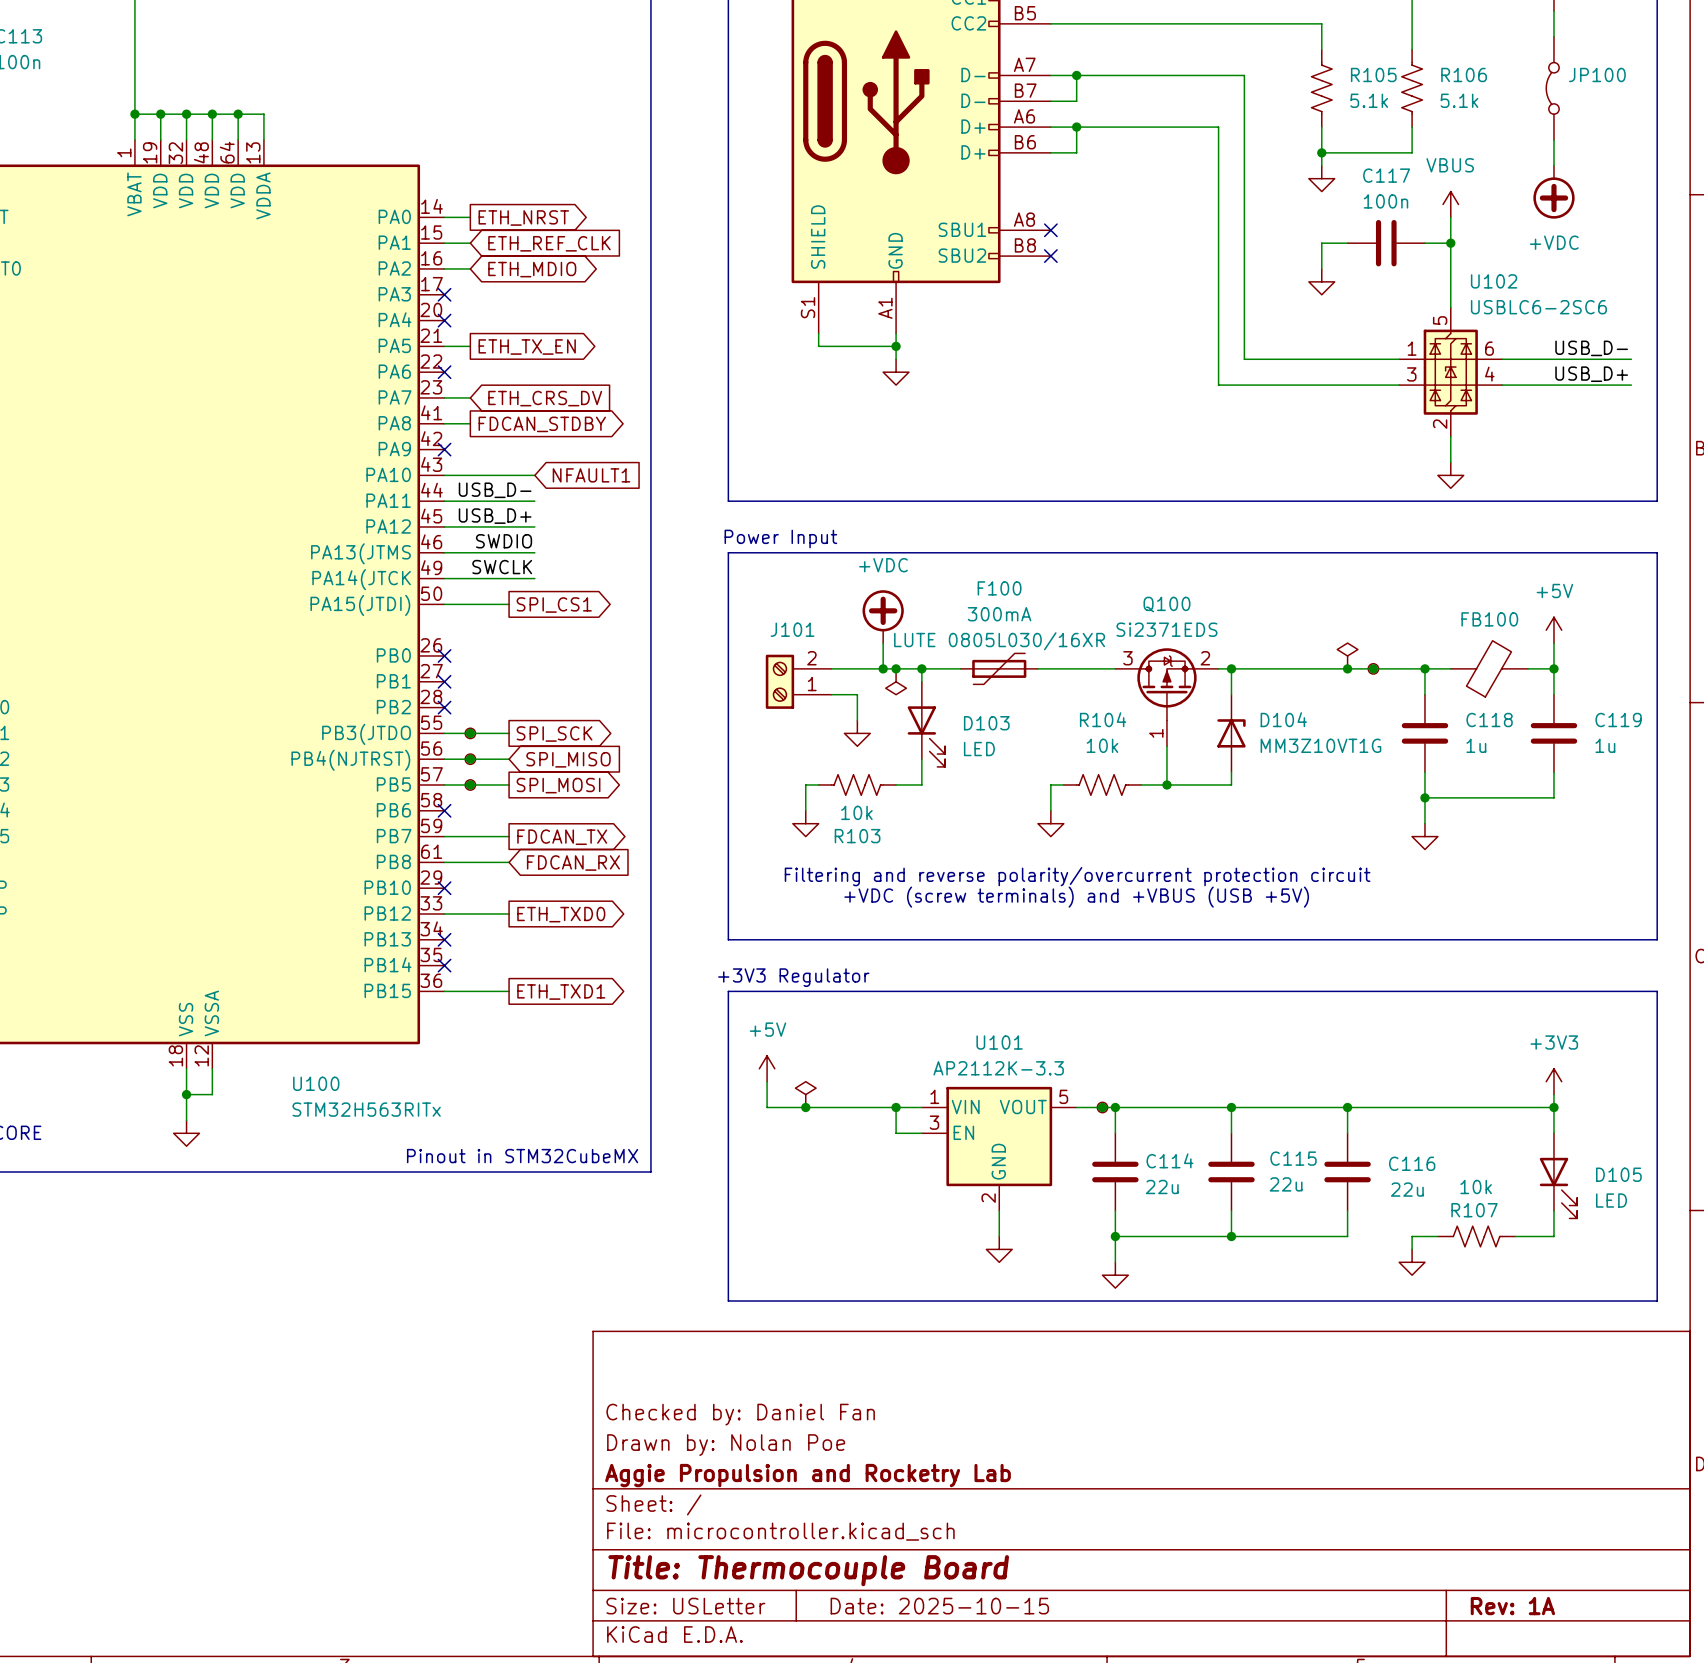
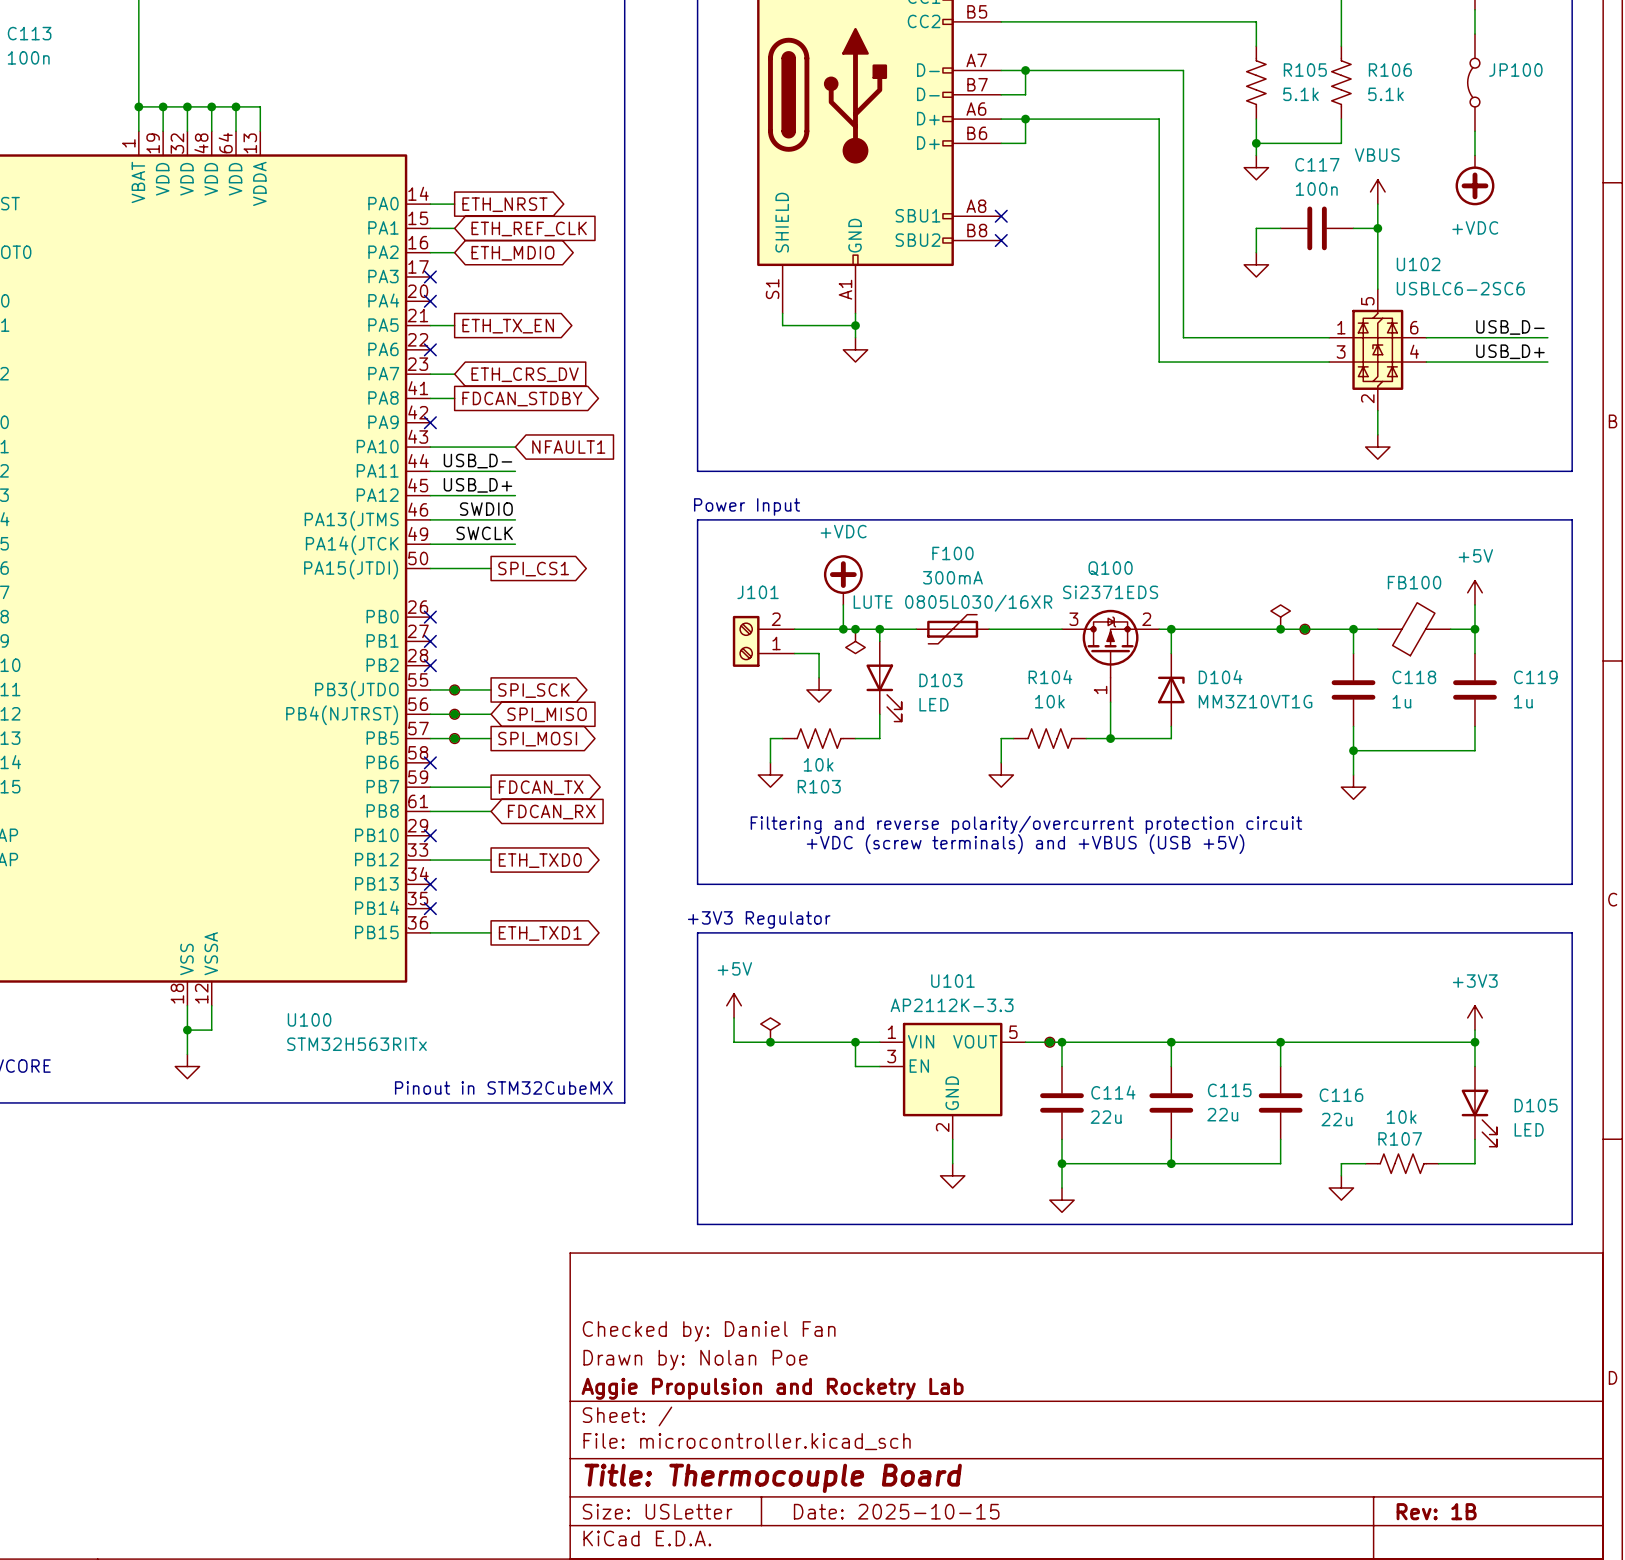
title block: Rev: 1A (1512, 1606) -> Rev: 1B (1436, 1511)

